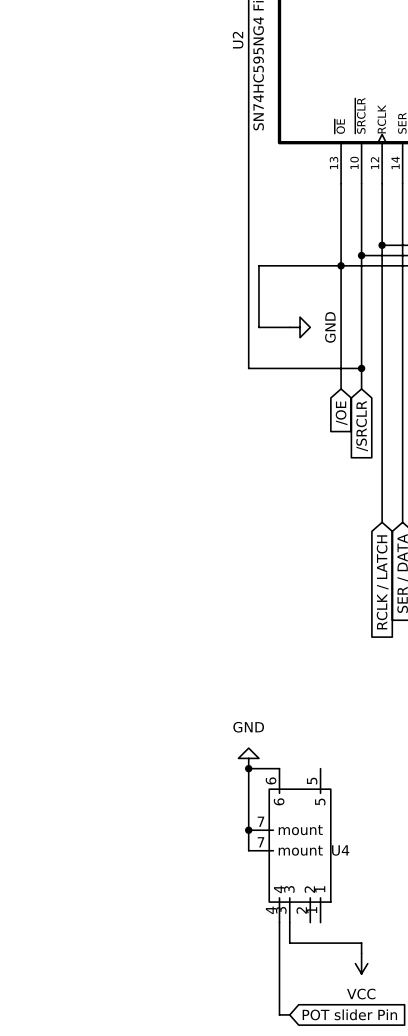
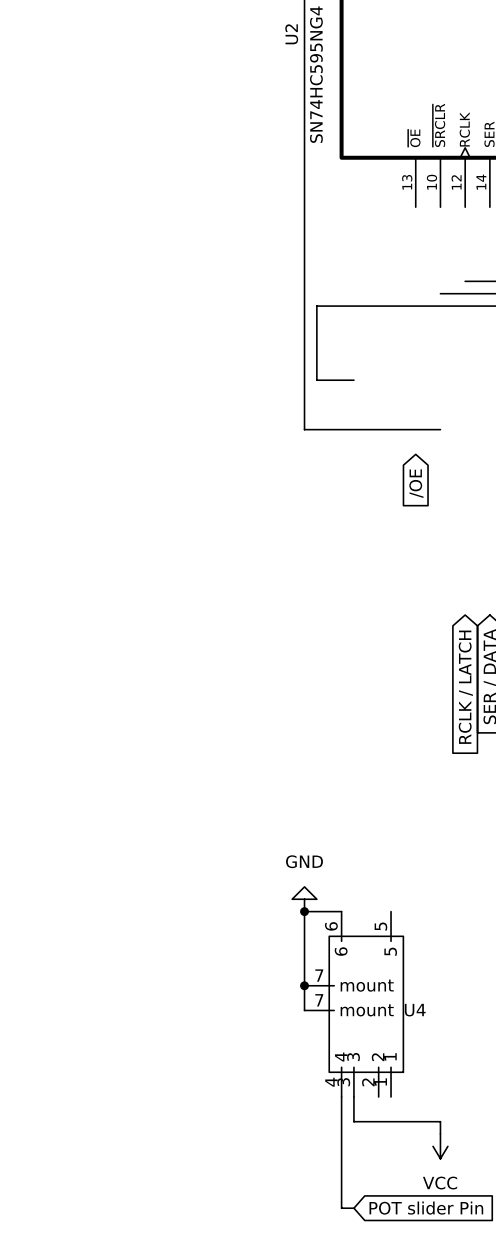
wire: (341, 183) (341, 388) -> none
wire: (361, 183) (361, 388) -> none
wire: (382, 183) (382, 522) -> none
wire: (402, 183) (402, 522) -> none
junction: (382, 245) -> none
junction: (361, 255) -> none
junction: (341, 265) -> none
power symbol: GND (300, 327) -> none
junction: (361, 368) -> none
global label: /SRCLR (362, 426) -> none

